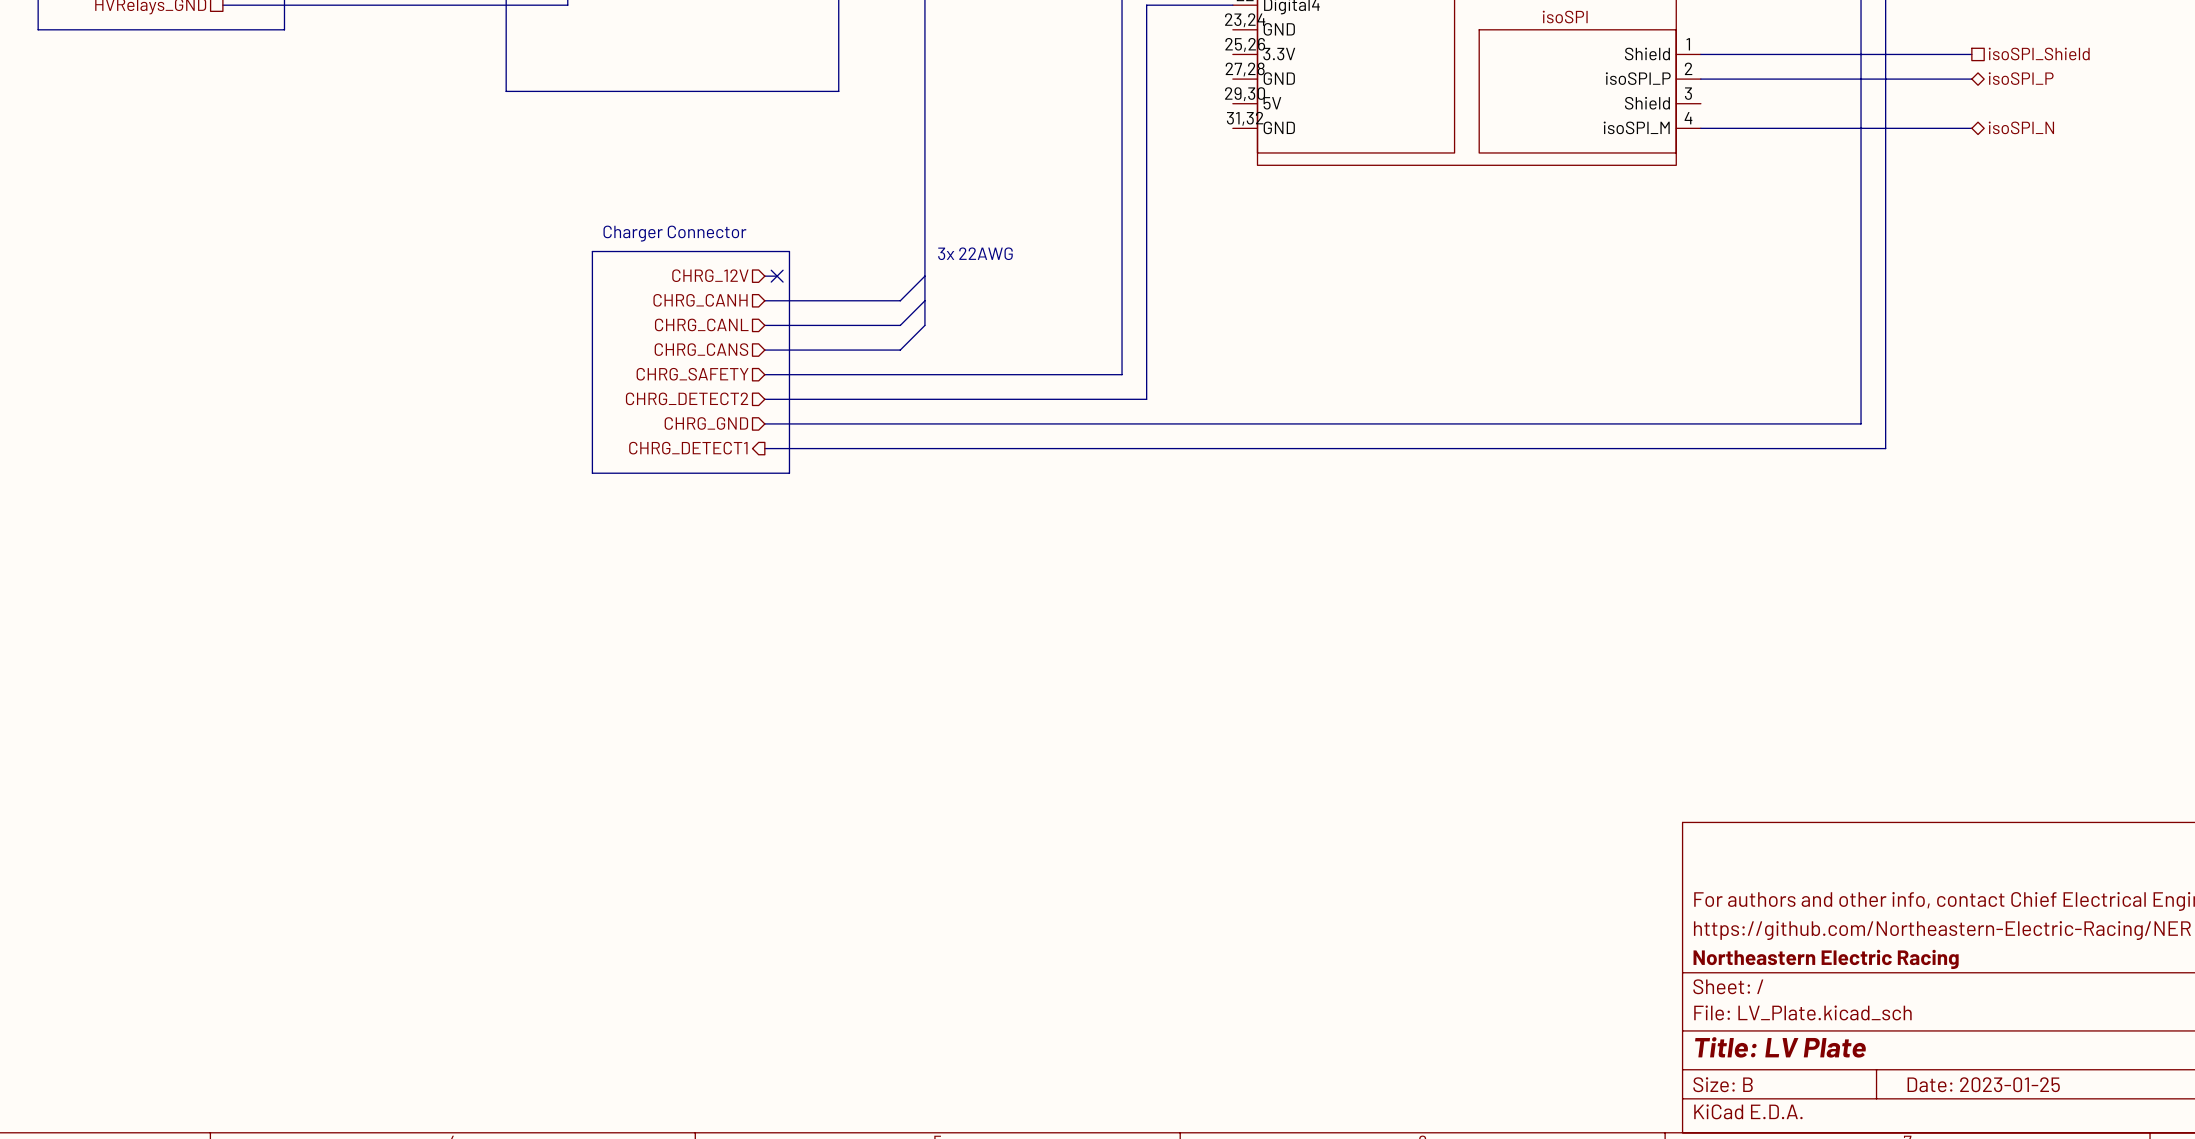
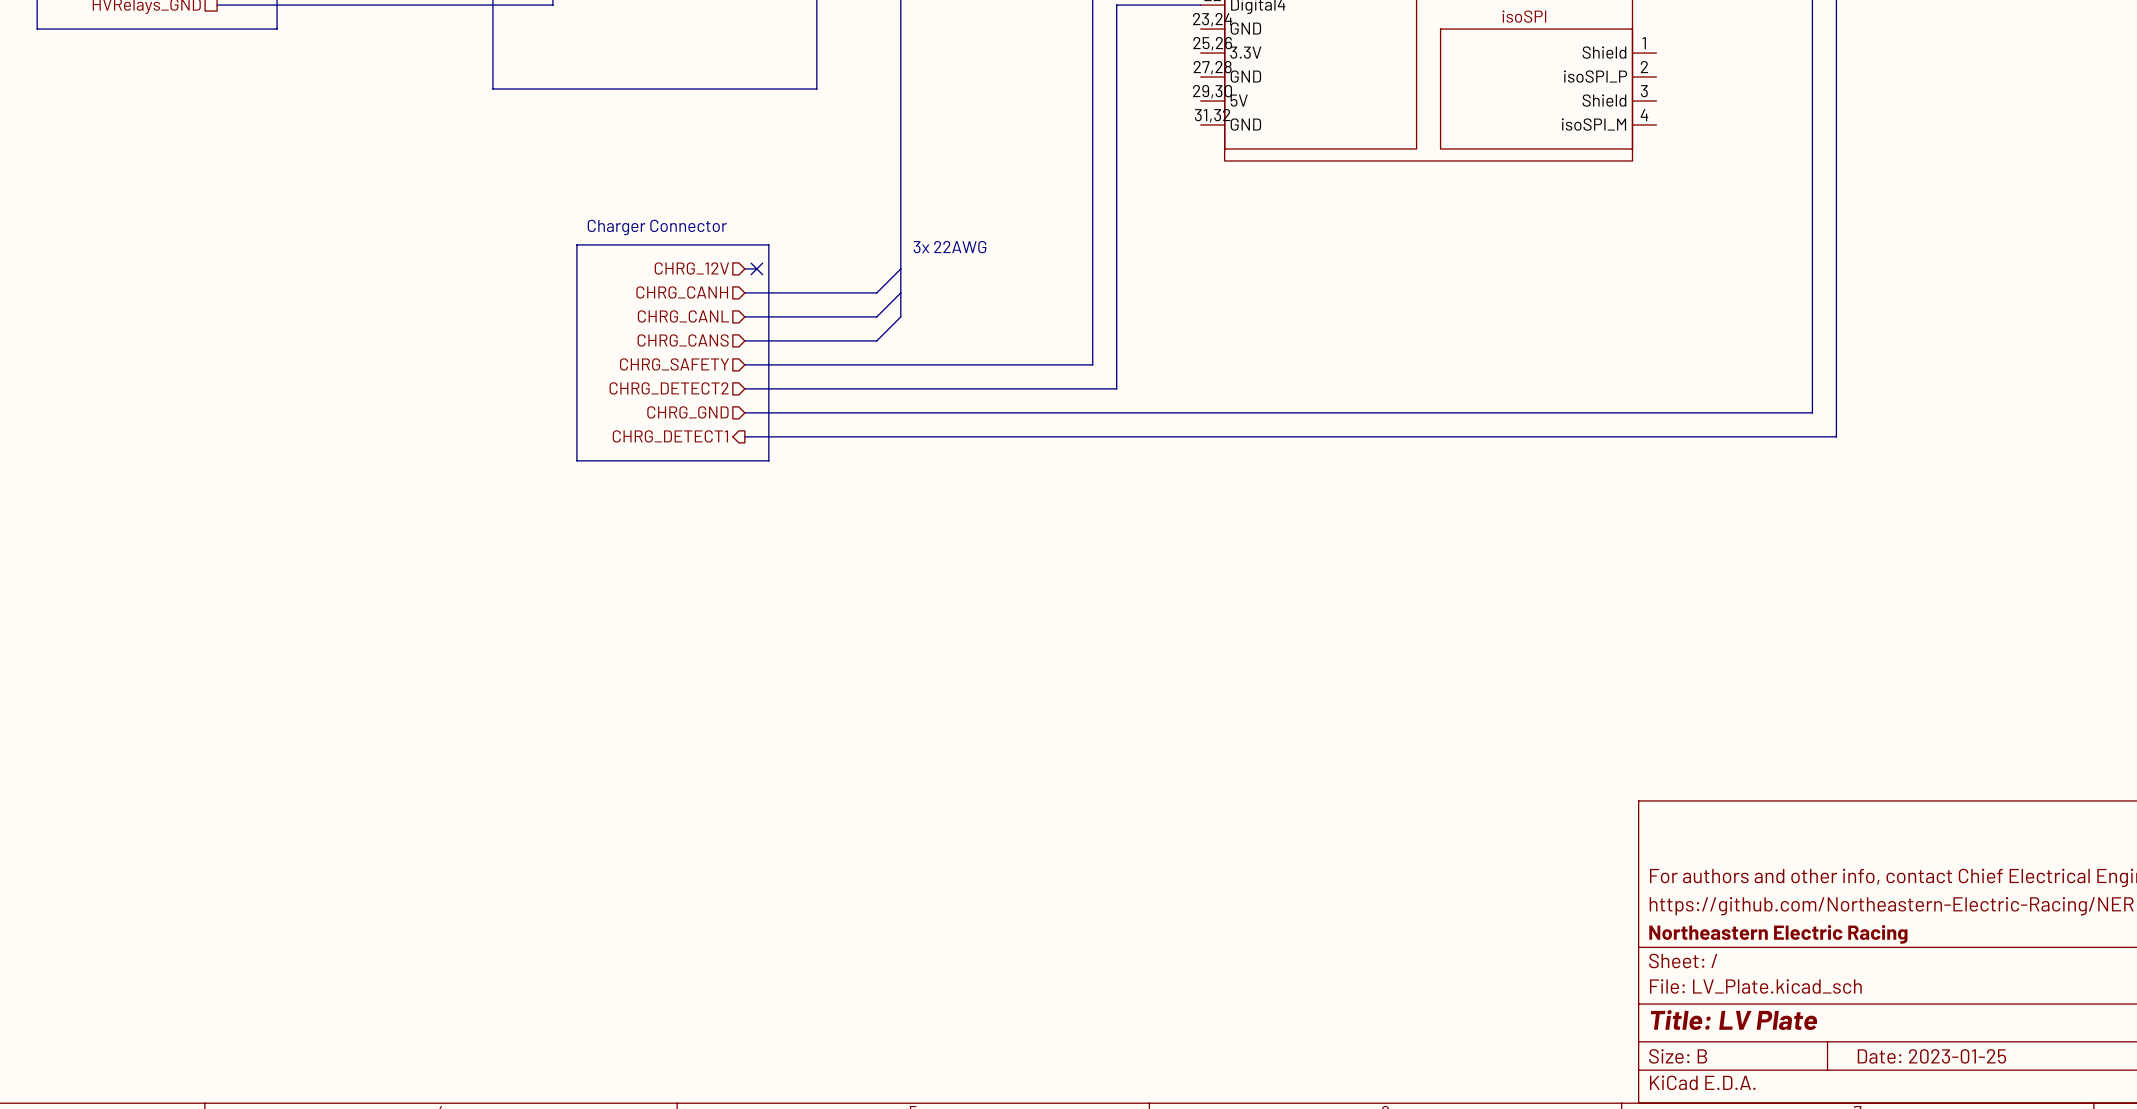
hierarchical label: isoSPI_Shield (2039, 53) -> none
wire: (1700, 54) (1971, 54) -> none
hierarchical label: isoSPI_P (2021, 78) -> none
wire: (1700, 79) (1971, 79) -> none
hierarchical label: isoSPI_N (2021, 127) -> none
wire: (1700, 128) (1971, 128) -> none

